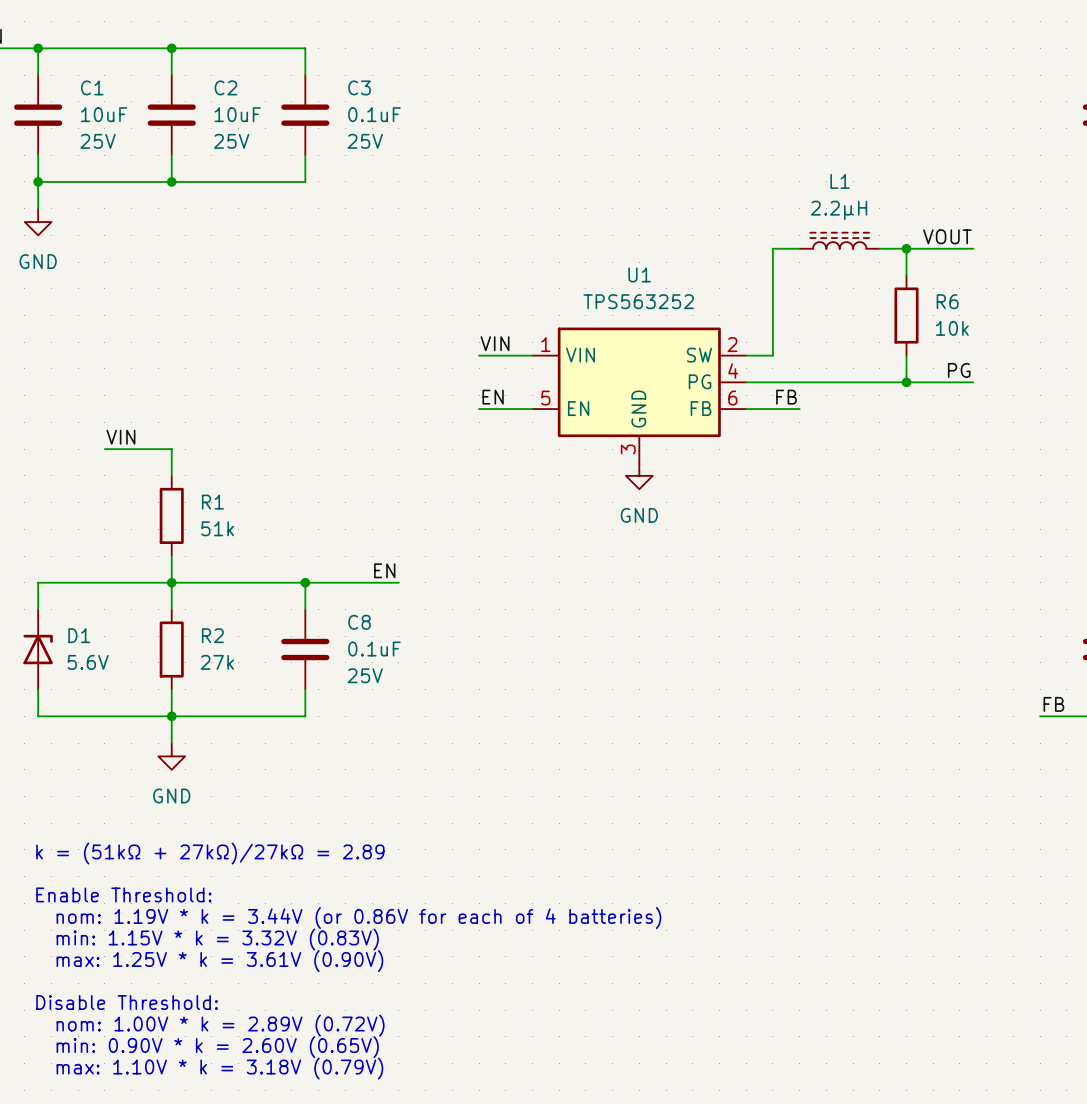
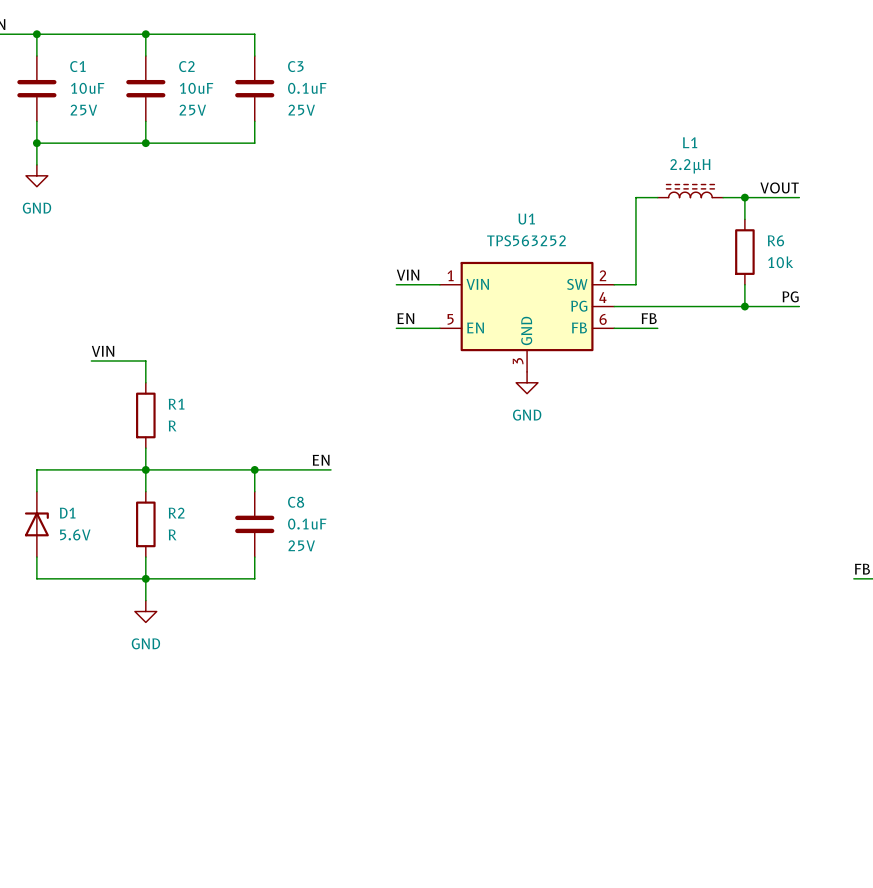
R1 value: 51k (217, 528) -> R (172, 425)
R2 value: 27k (217, 662) -> R (172, 534)
text: k = (51kΩ + 27kΩ)/27kΩ = 2.89 (210, 853) -> none
text: Enable Threshold: (123, 894) -> none
text: nom: 1.19V * k = 3.44V (or 0.86V for each of 4 batteries) (358, 918) -> none
text: min: 1.15V * k = 3.32V (0.83V) (217, 939) -> none
text: max: 1.25V * k = 3.61V (0.90V) (219, 961) -> none
text: Disable Threshold: (127, 1002) -> none
text: nom: 1.00V * k = 2.89V (0.72V) (220, 1025) -> none
text: min: 0.90V * k = 2.60V (0.65V) (217, 1047) -> none
text: max: 1.10V * k = 3.18V (0.79V) (219, 1068) -> none

